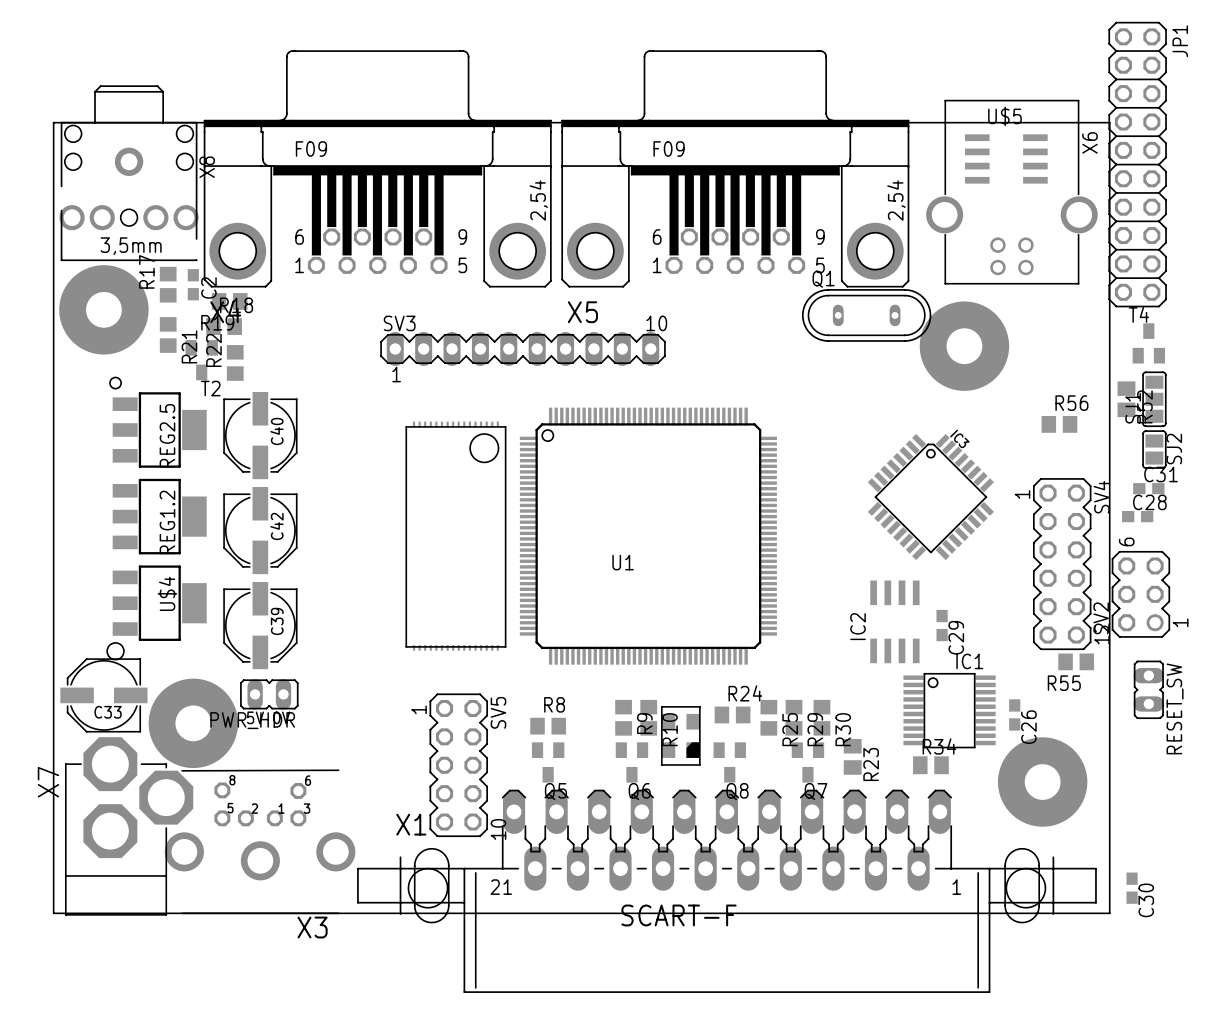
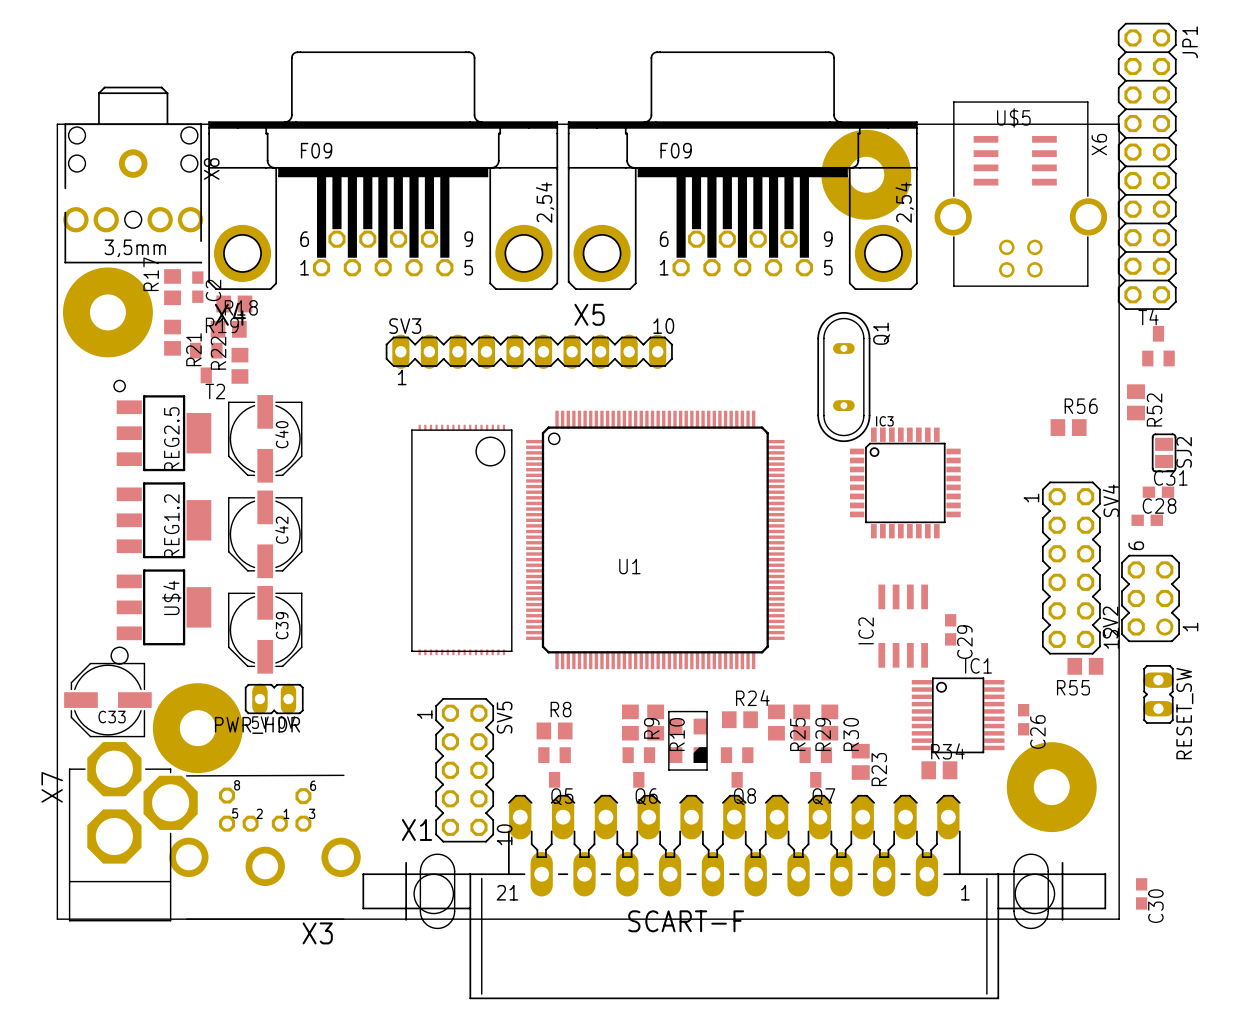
Q1 rotation: 0° (866, 315) -> 90° clockwise (843, 377)
part position: (964, 346) -> (866, 174)
SJ1: (1154, 399) -> none
IC3 rotation: 0° (930, 497) -> 45° counterclockwise (905, 482)

